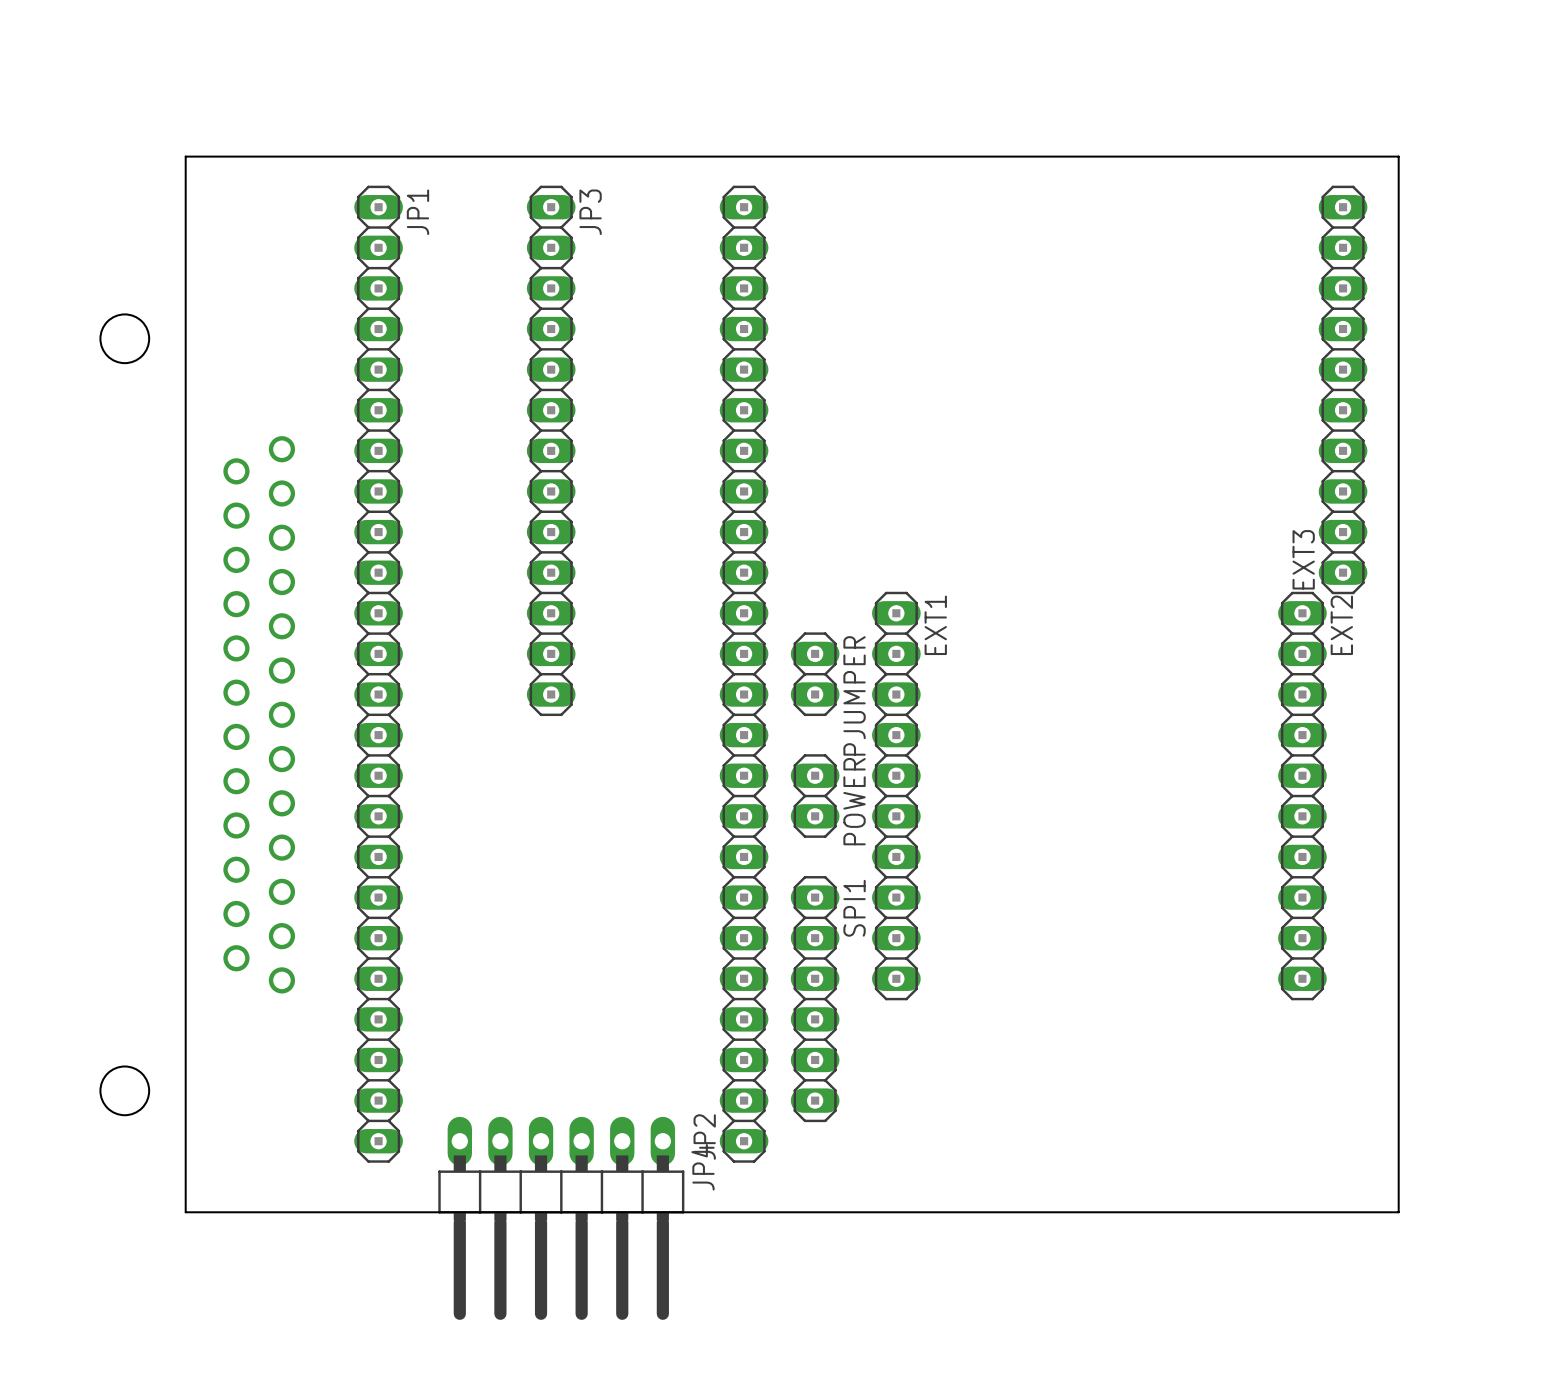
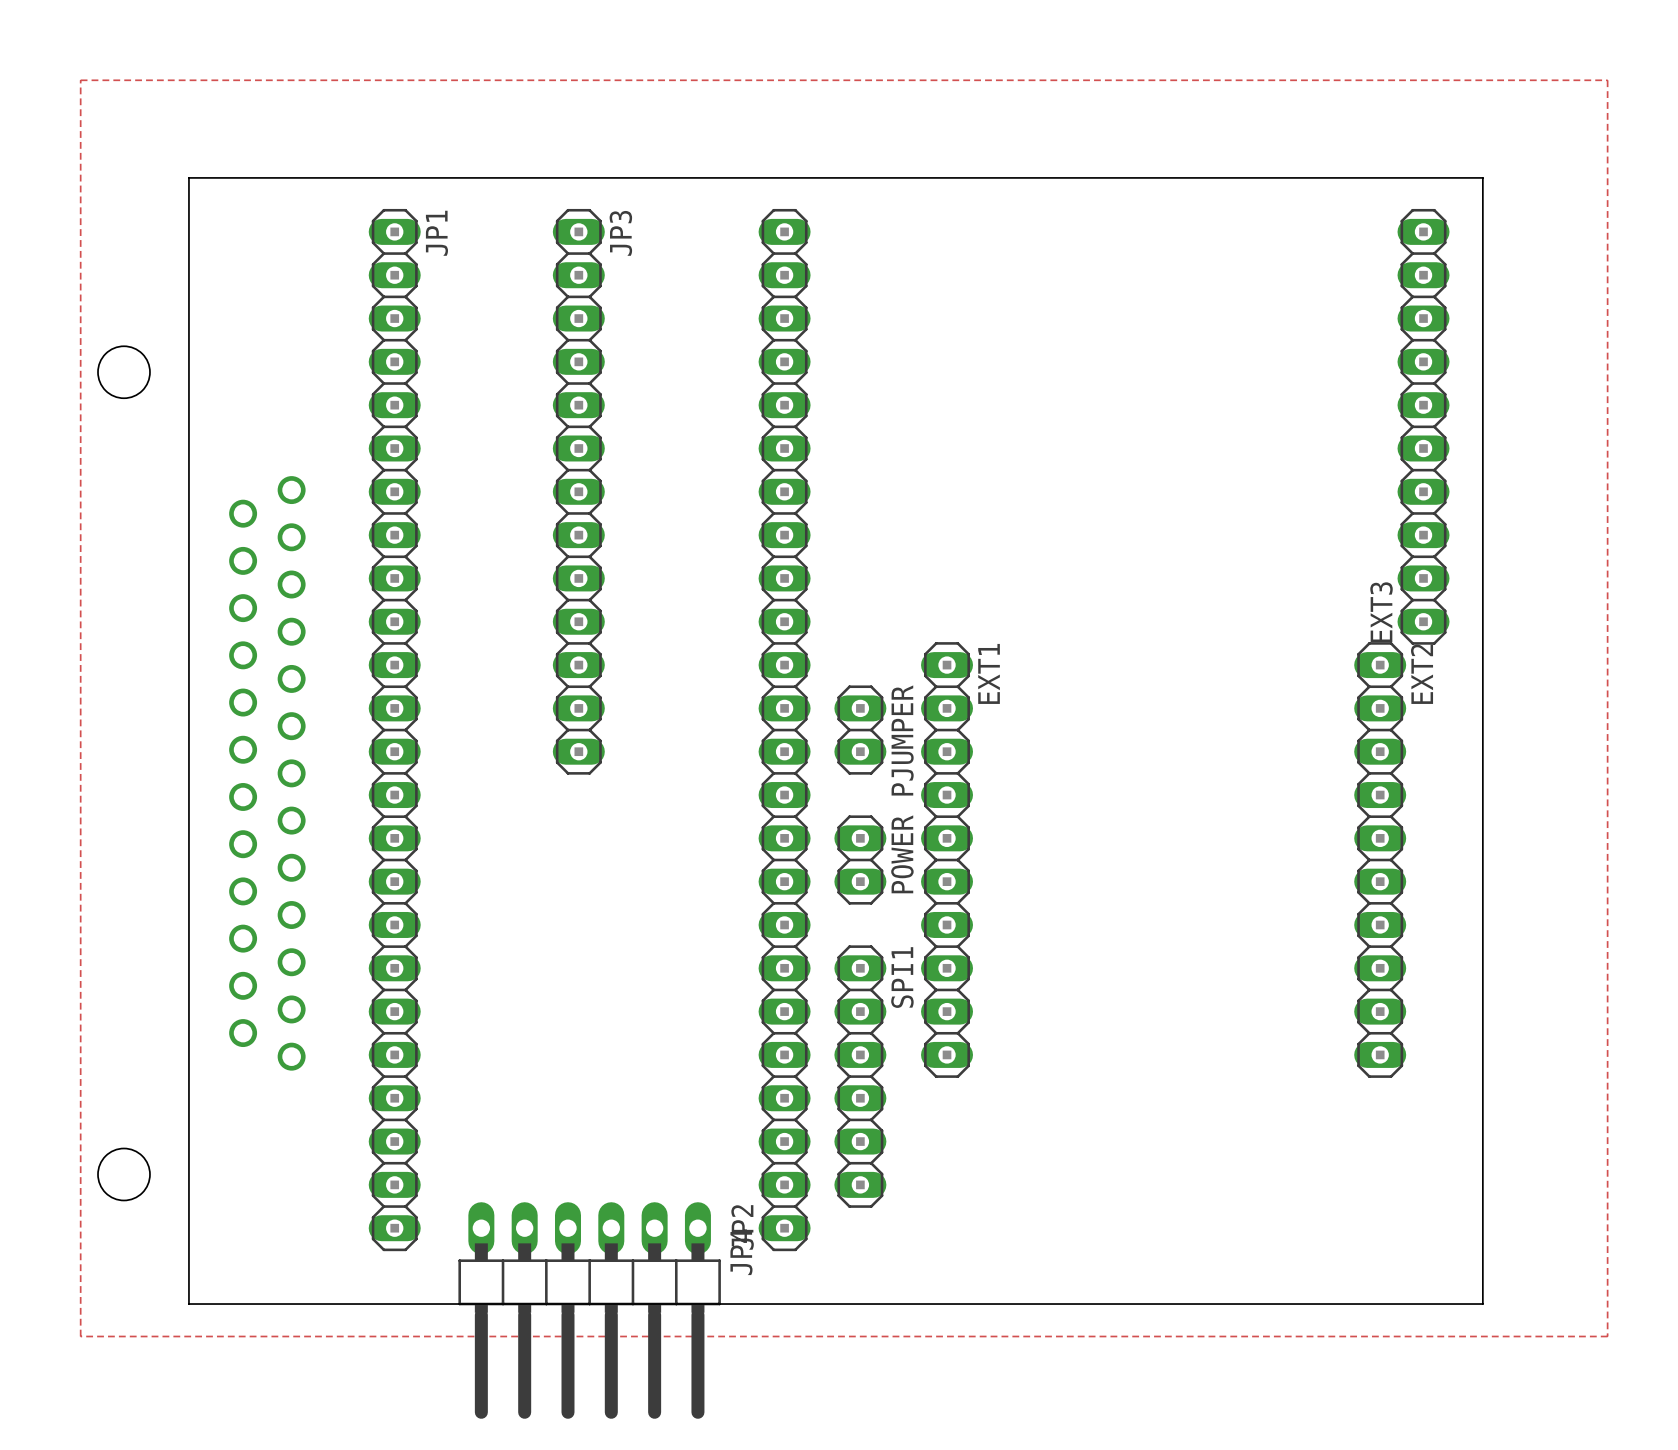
zone outline: none -> (80, 80) (1607, 80) (1607, 1336) (80, 1336) (80, 80)

